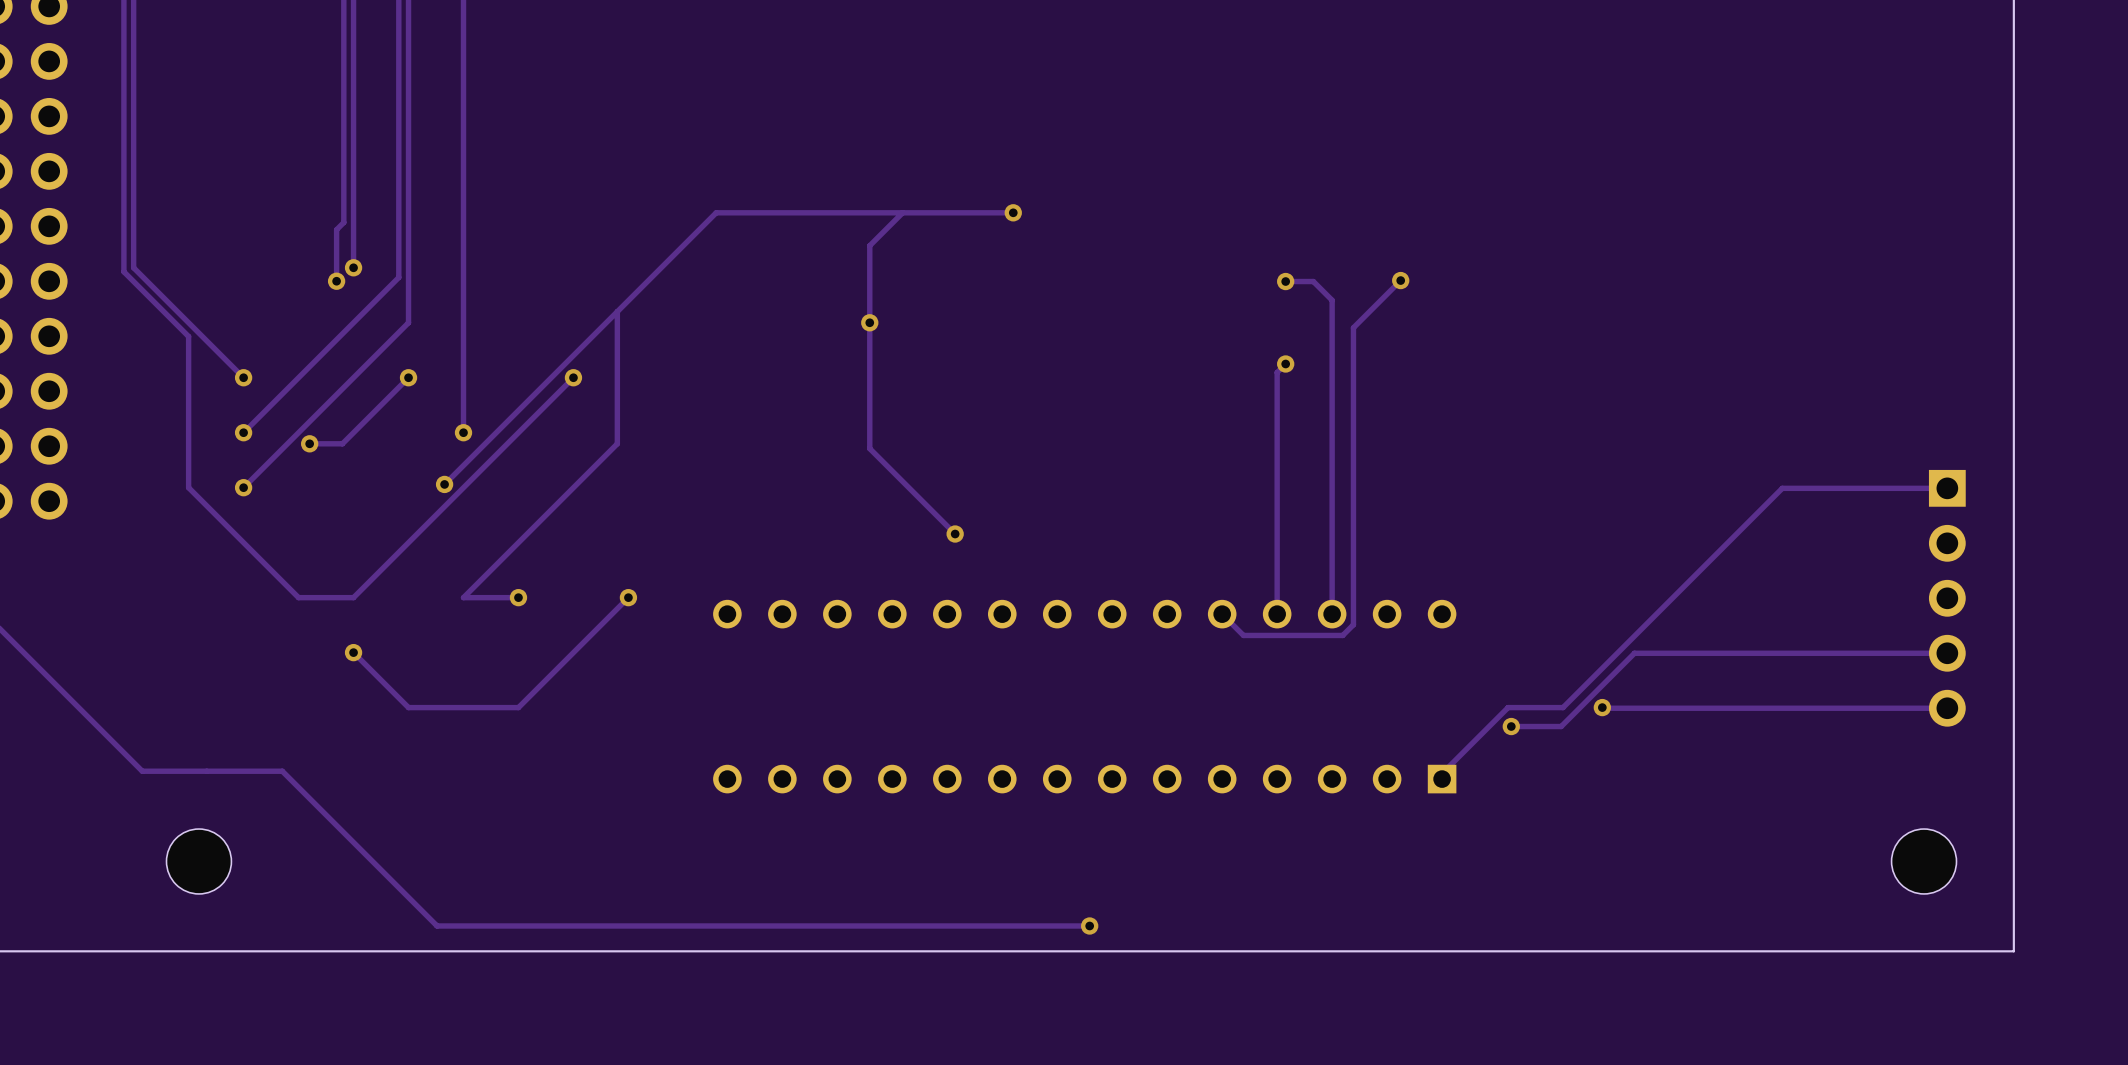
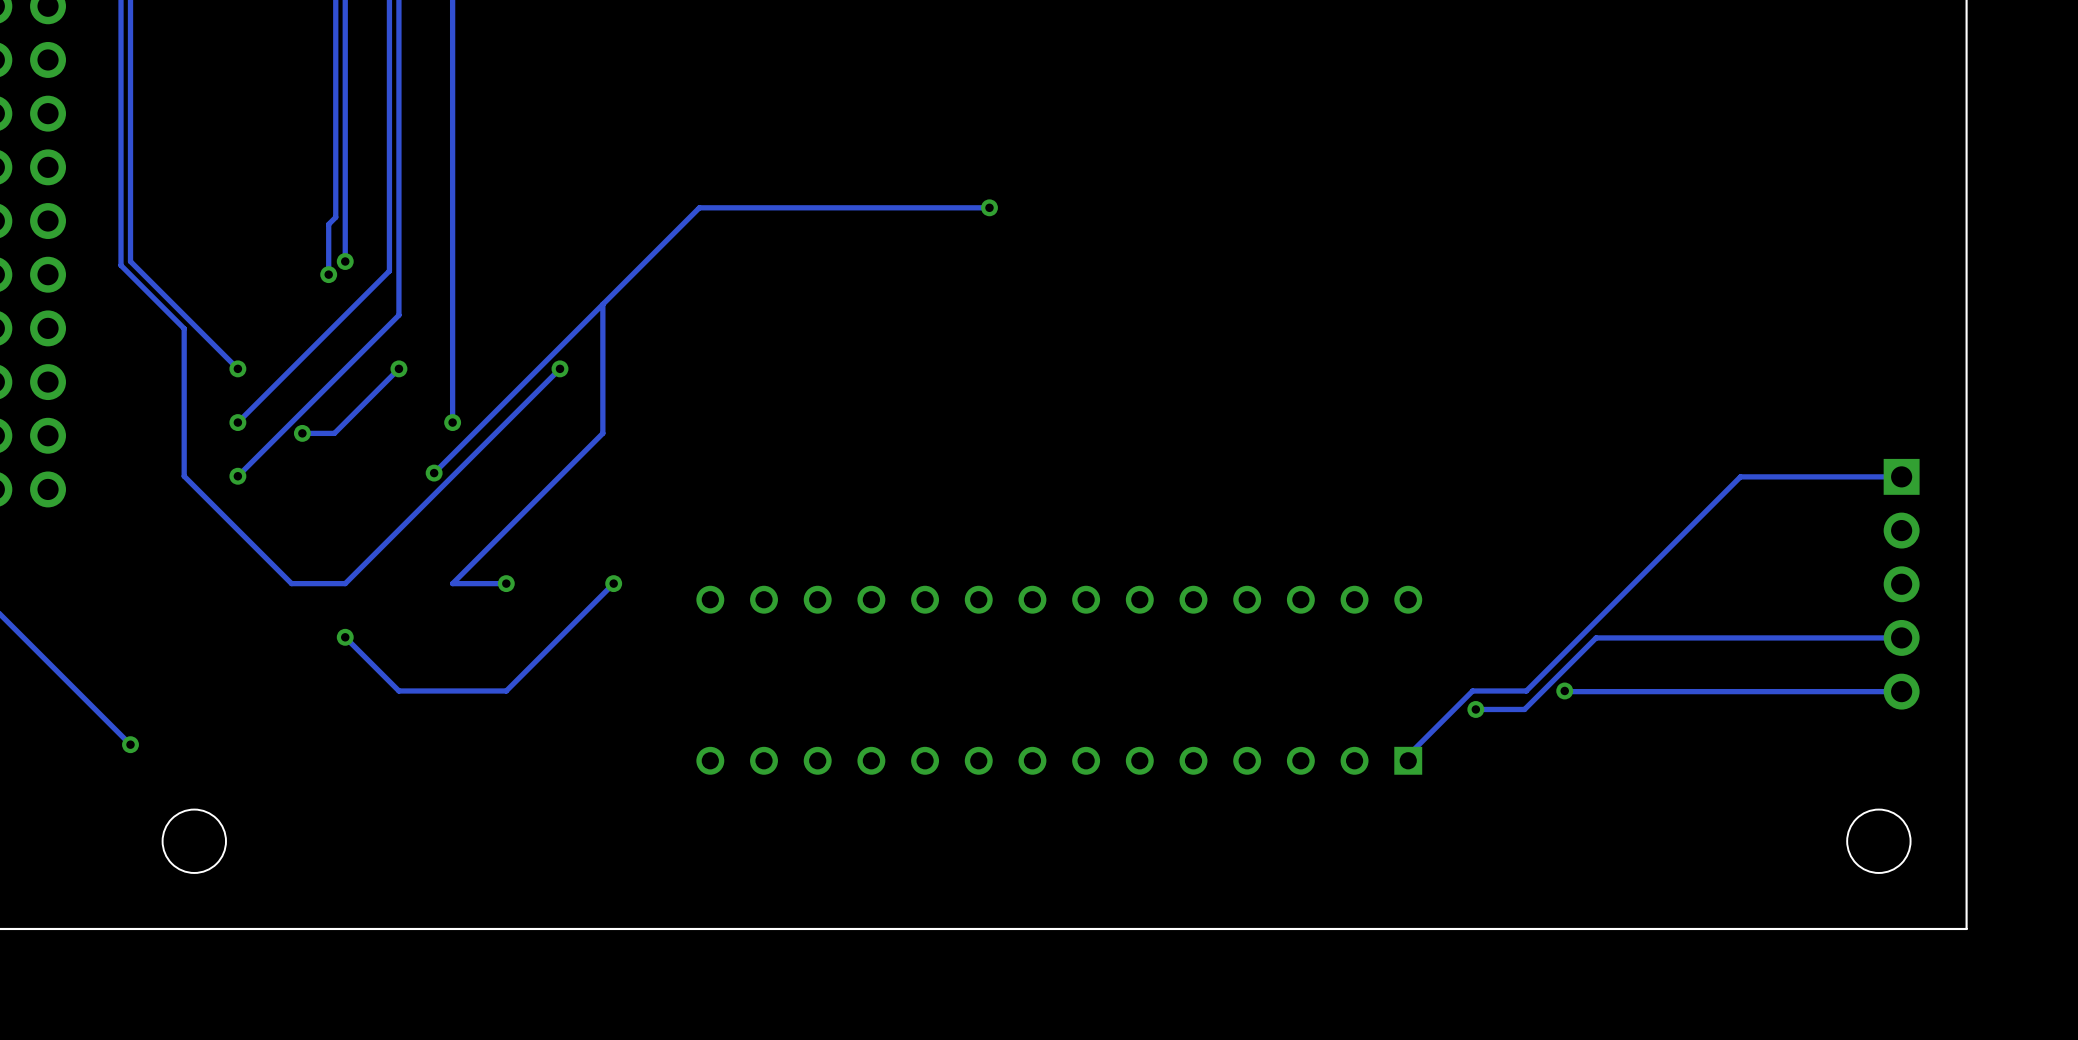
track: (902, 212) (869, 245) (869, 448) (955, 534) -> none
track: (1400, 280) (1353, 327) (1353, 624) (1342, 635) (1243, 635) (1222, 614) -> none
via: (1400, 280) -> none
track: (1285, 281) (1313, 281) (1332, 300) (1332, 614) -> none
via: (1285, 281) -> none
via: (869, 322) -> none
track: (1285, 363) (1277, 372) (1277, 614) -> none
via: (1285, 363) -> none
via: (955, 534) -> none
track: (133, 762) (142, 771) (282, 771) (437, 925) (1089, 925) -> none
via: none -> (130, 744)
via: (1089, 925) -> none

